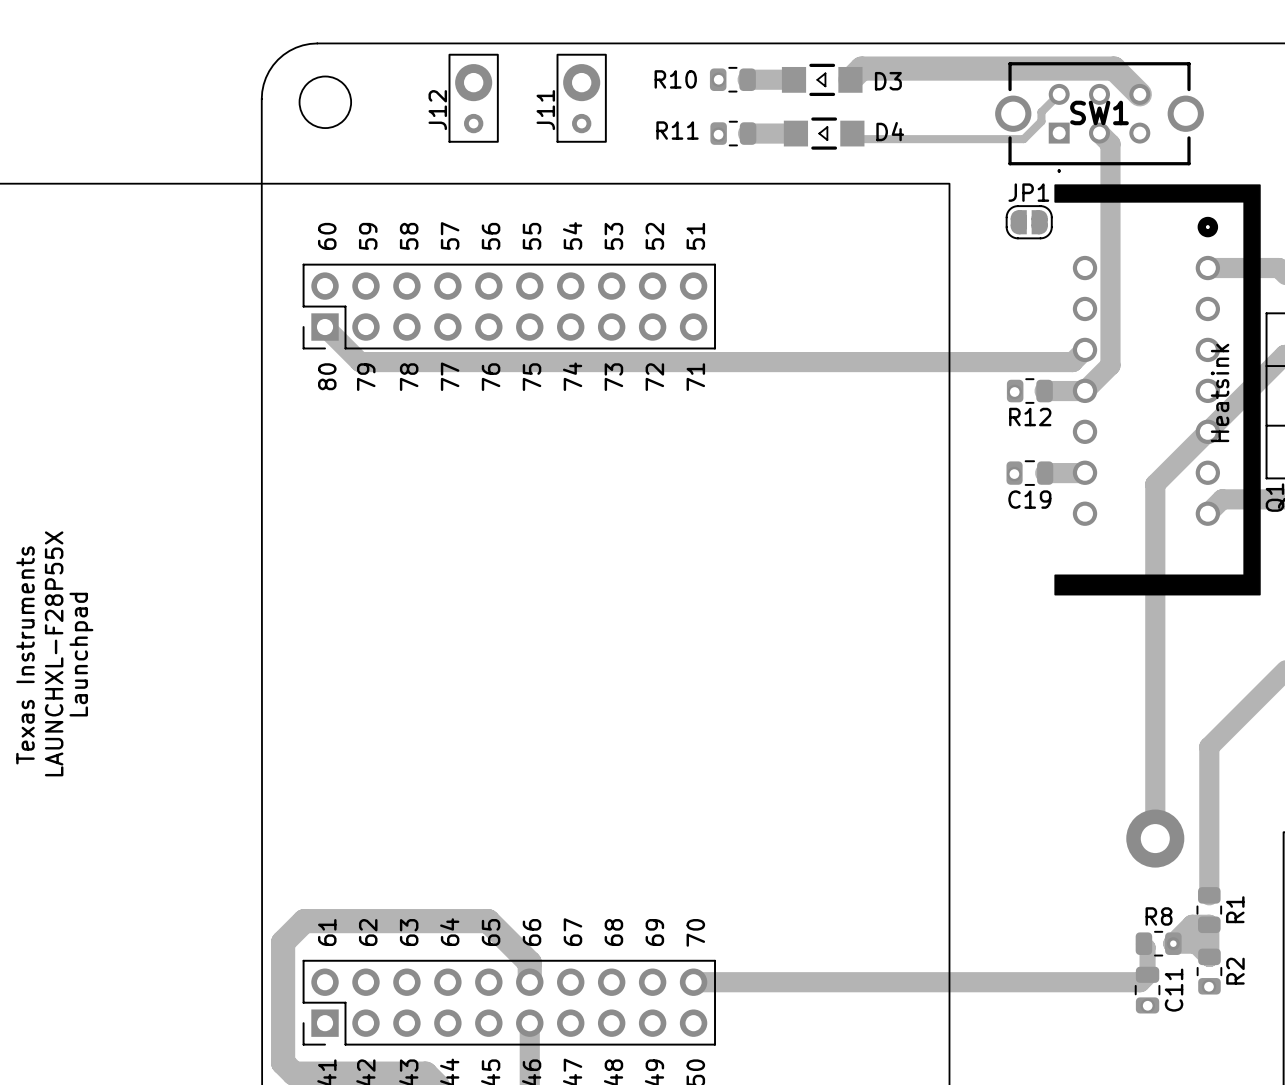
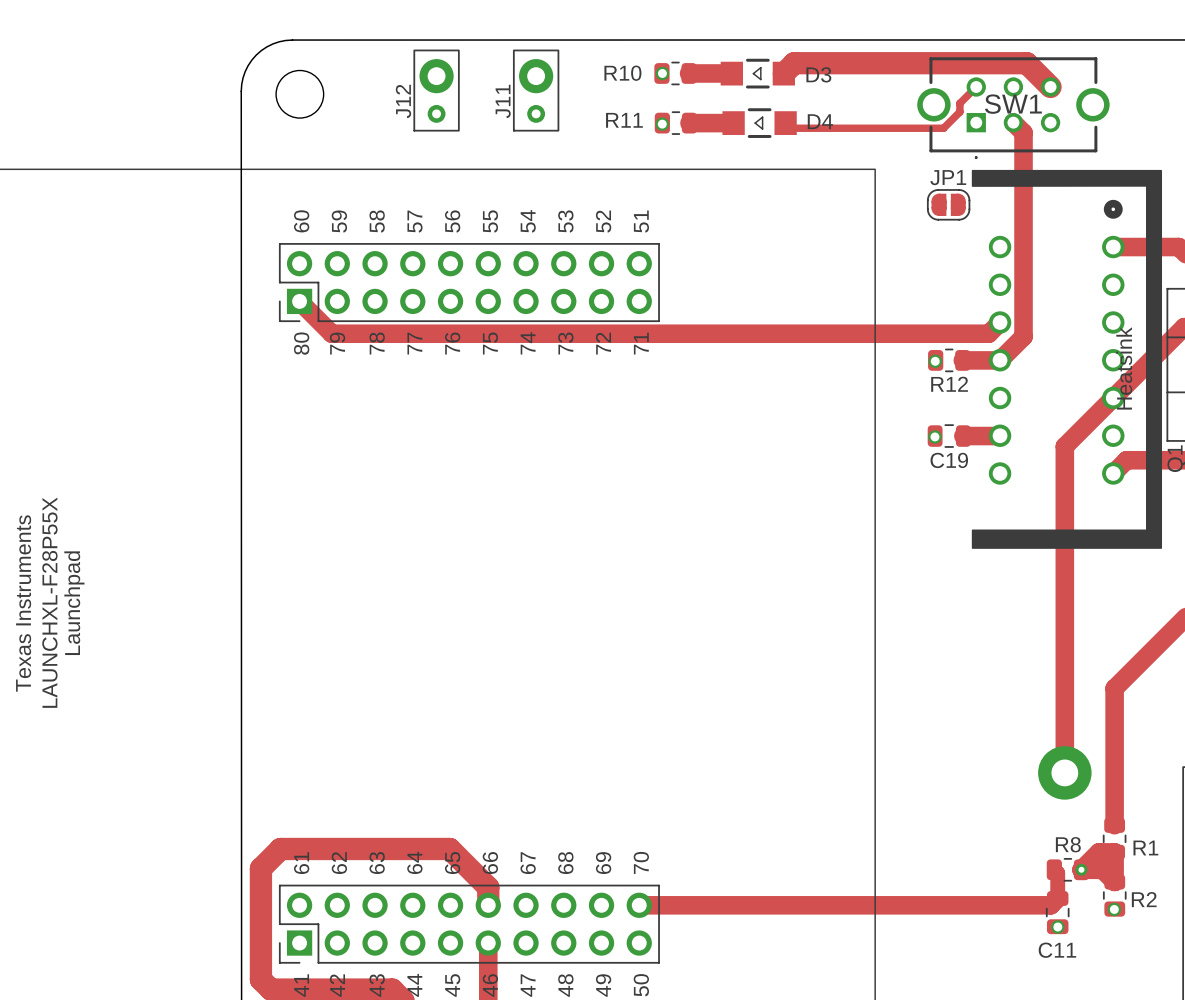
R1 name rotation: 0° (1235, 909) -> 90° clockwise (1145, 847)
R2 name rotation: 0° (1235, 971) -> 90° clockwise (1144, 899)
C11 name rotation: 0° (1174, 990) -> 90° clockwise (1057, 950)

